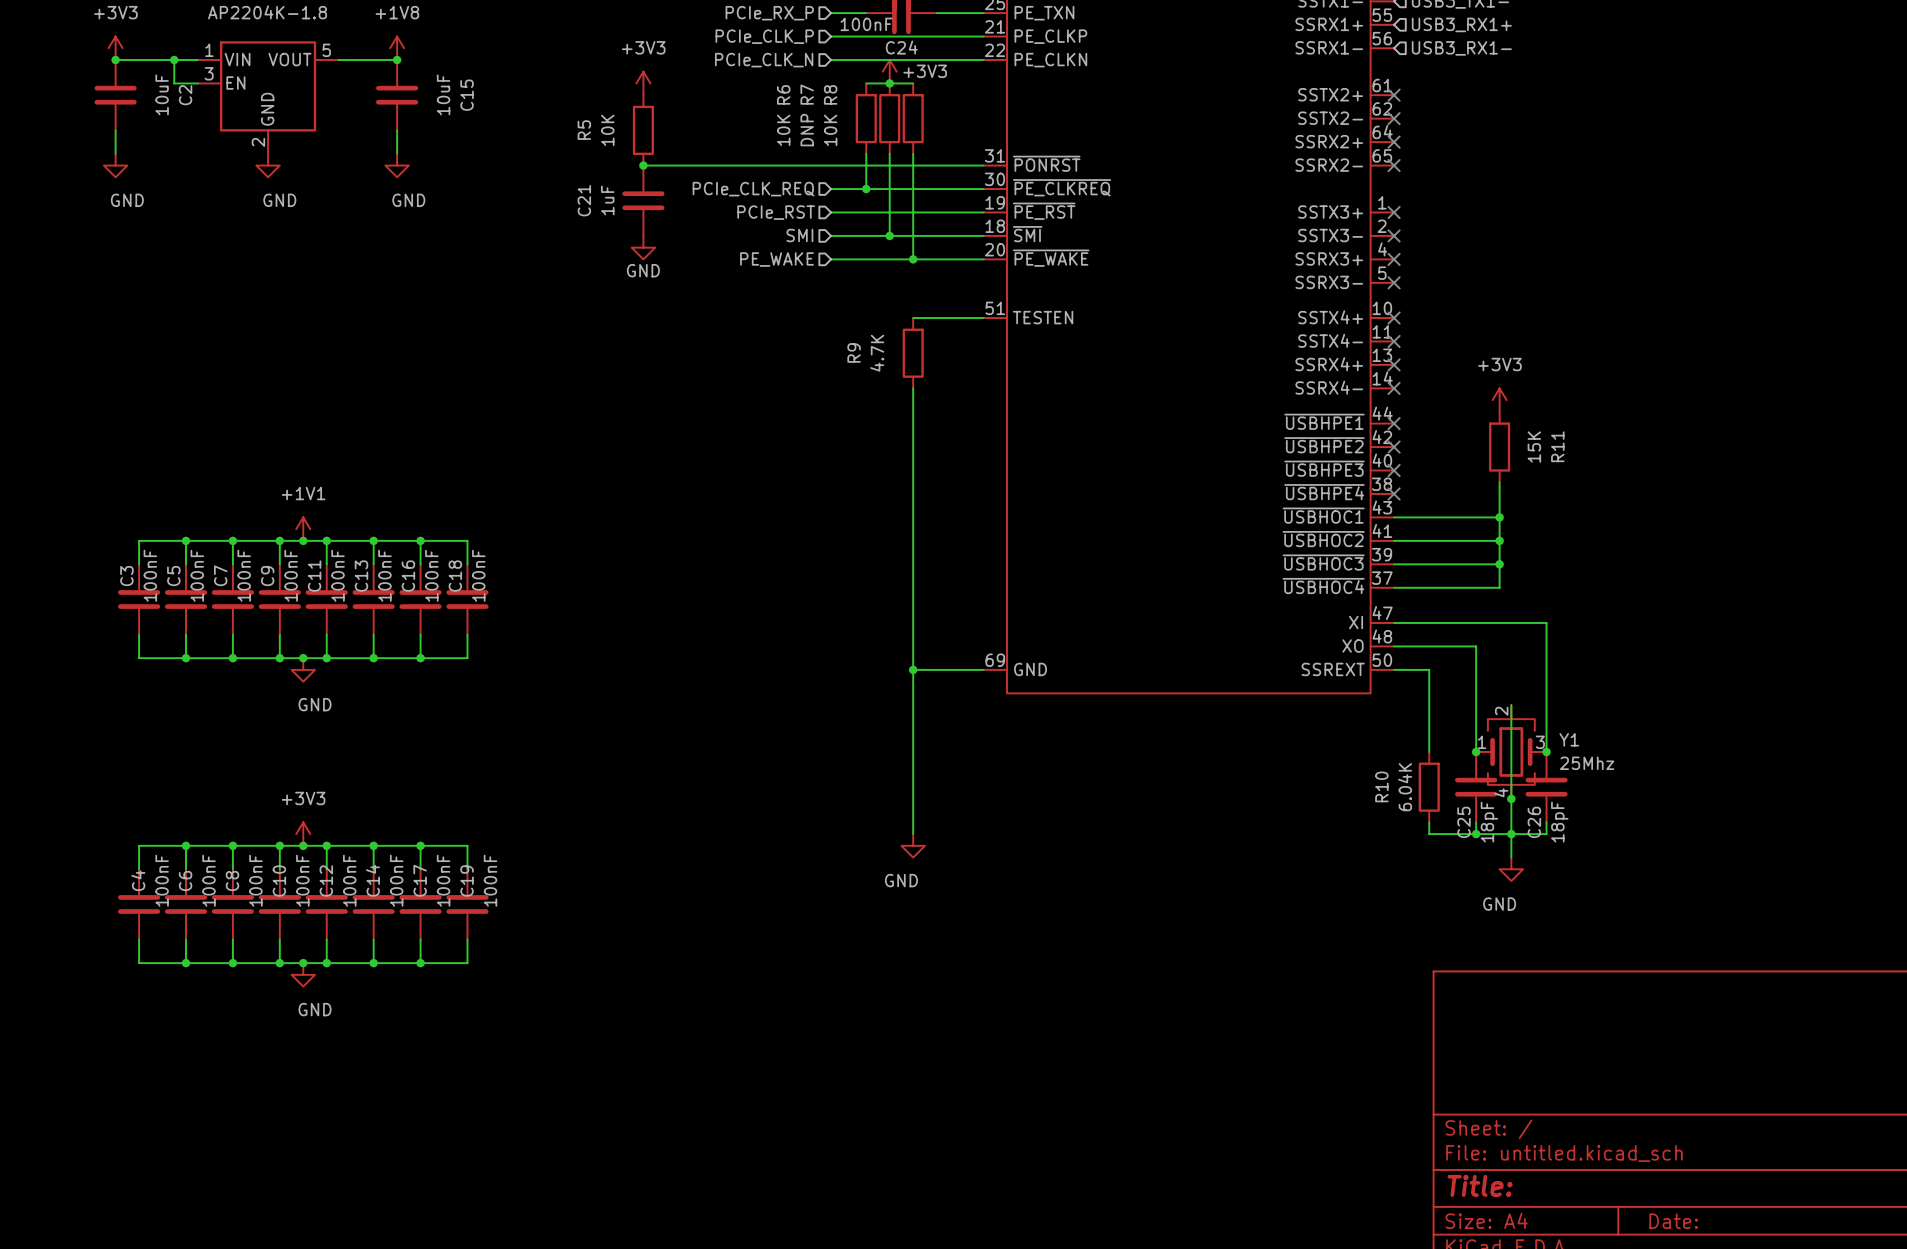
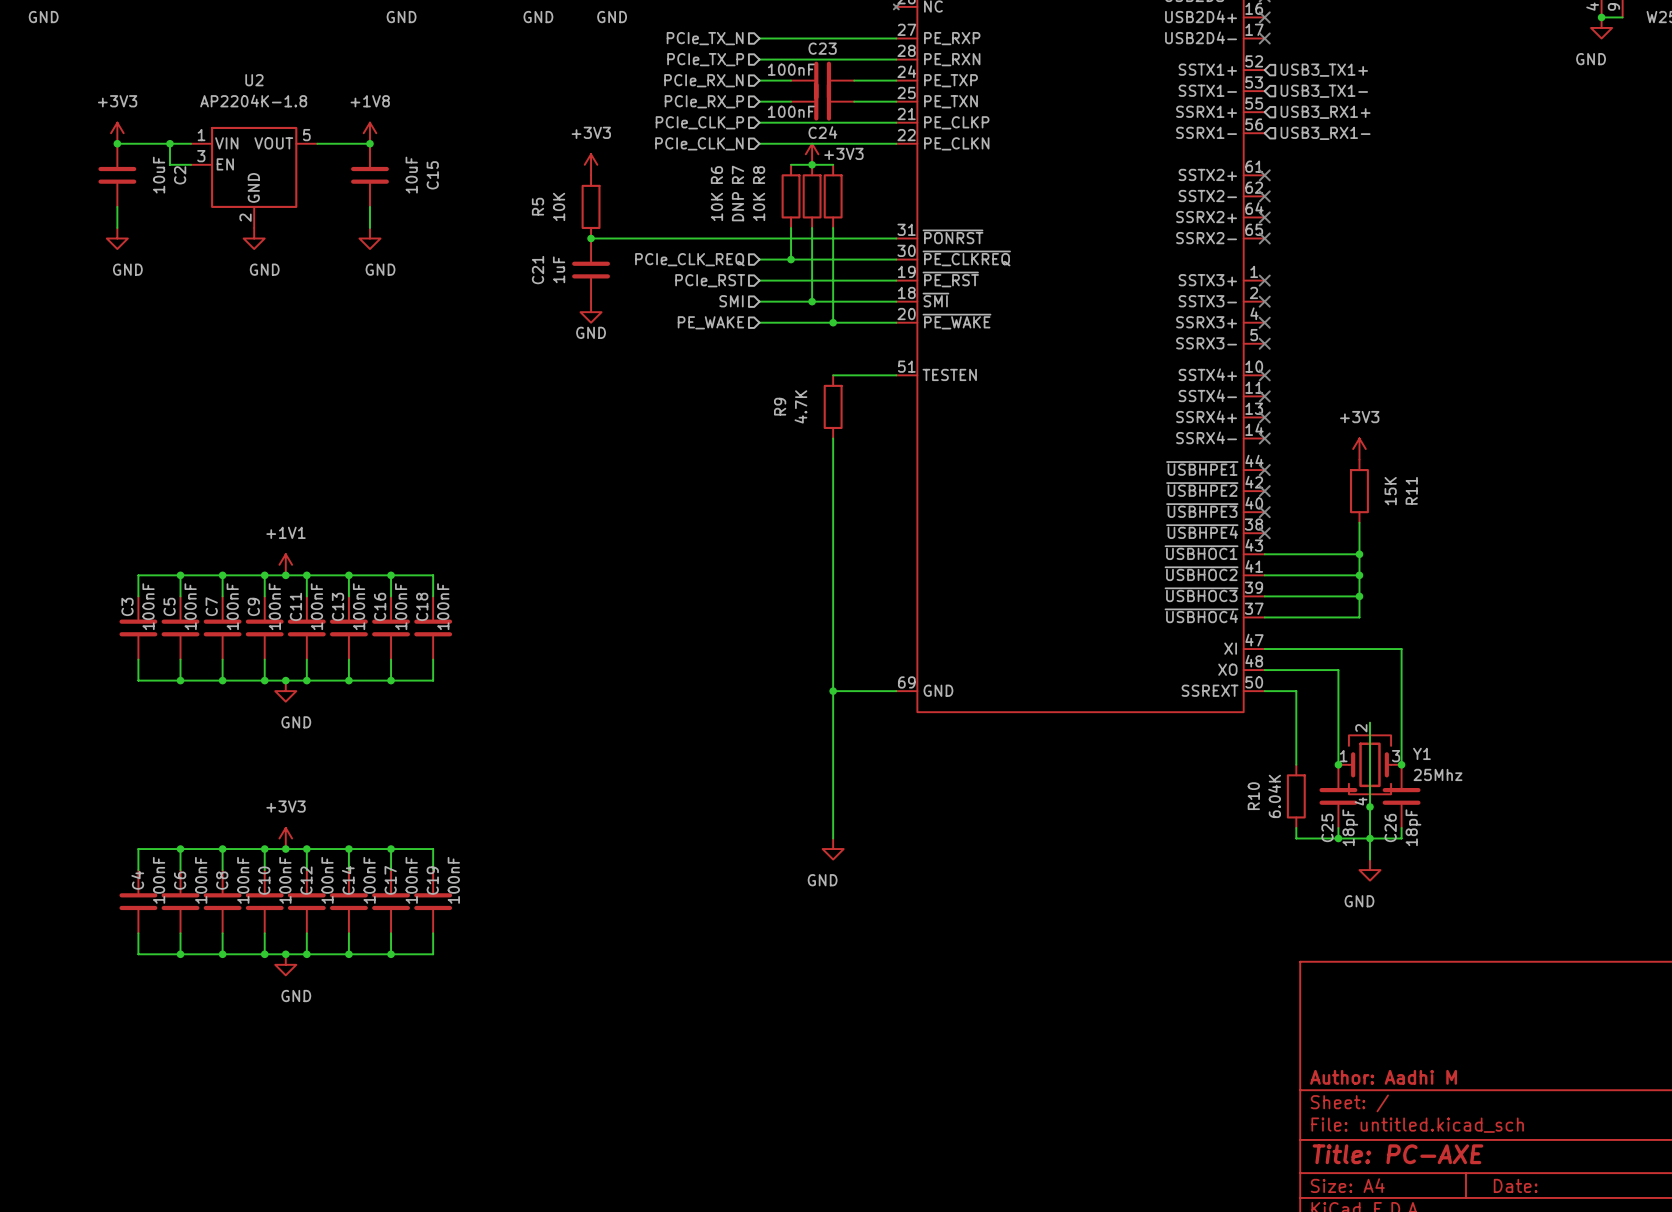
title block: none -> Author: Aadhi M (1383, 1077)
title block: Title: (1480, 1185) -> Title: PC-AXE (1398, 1154)

